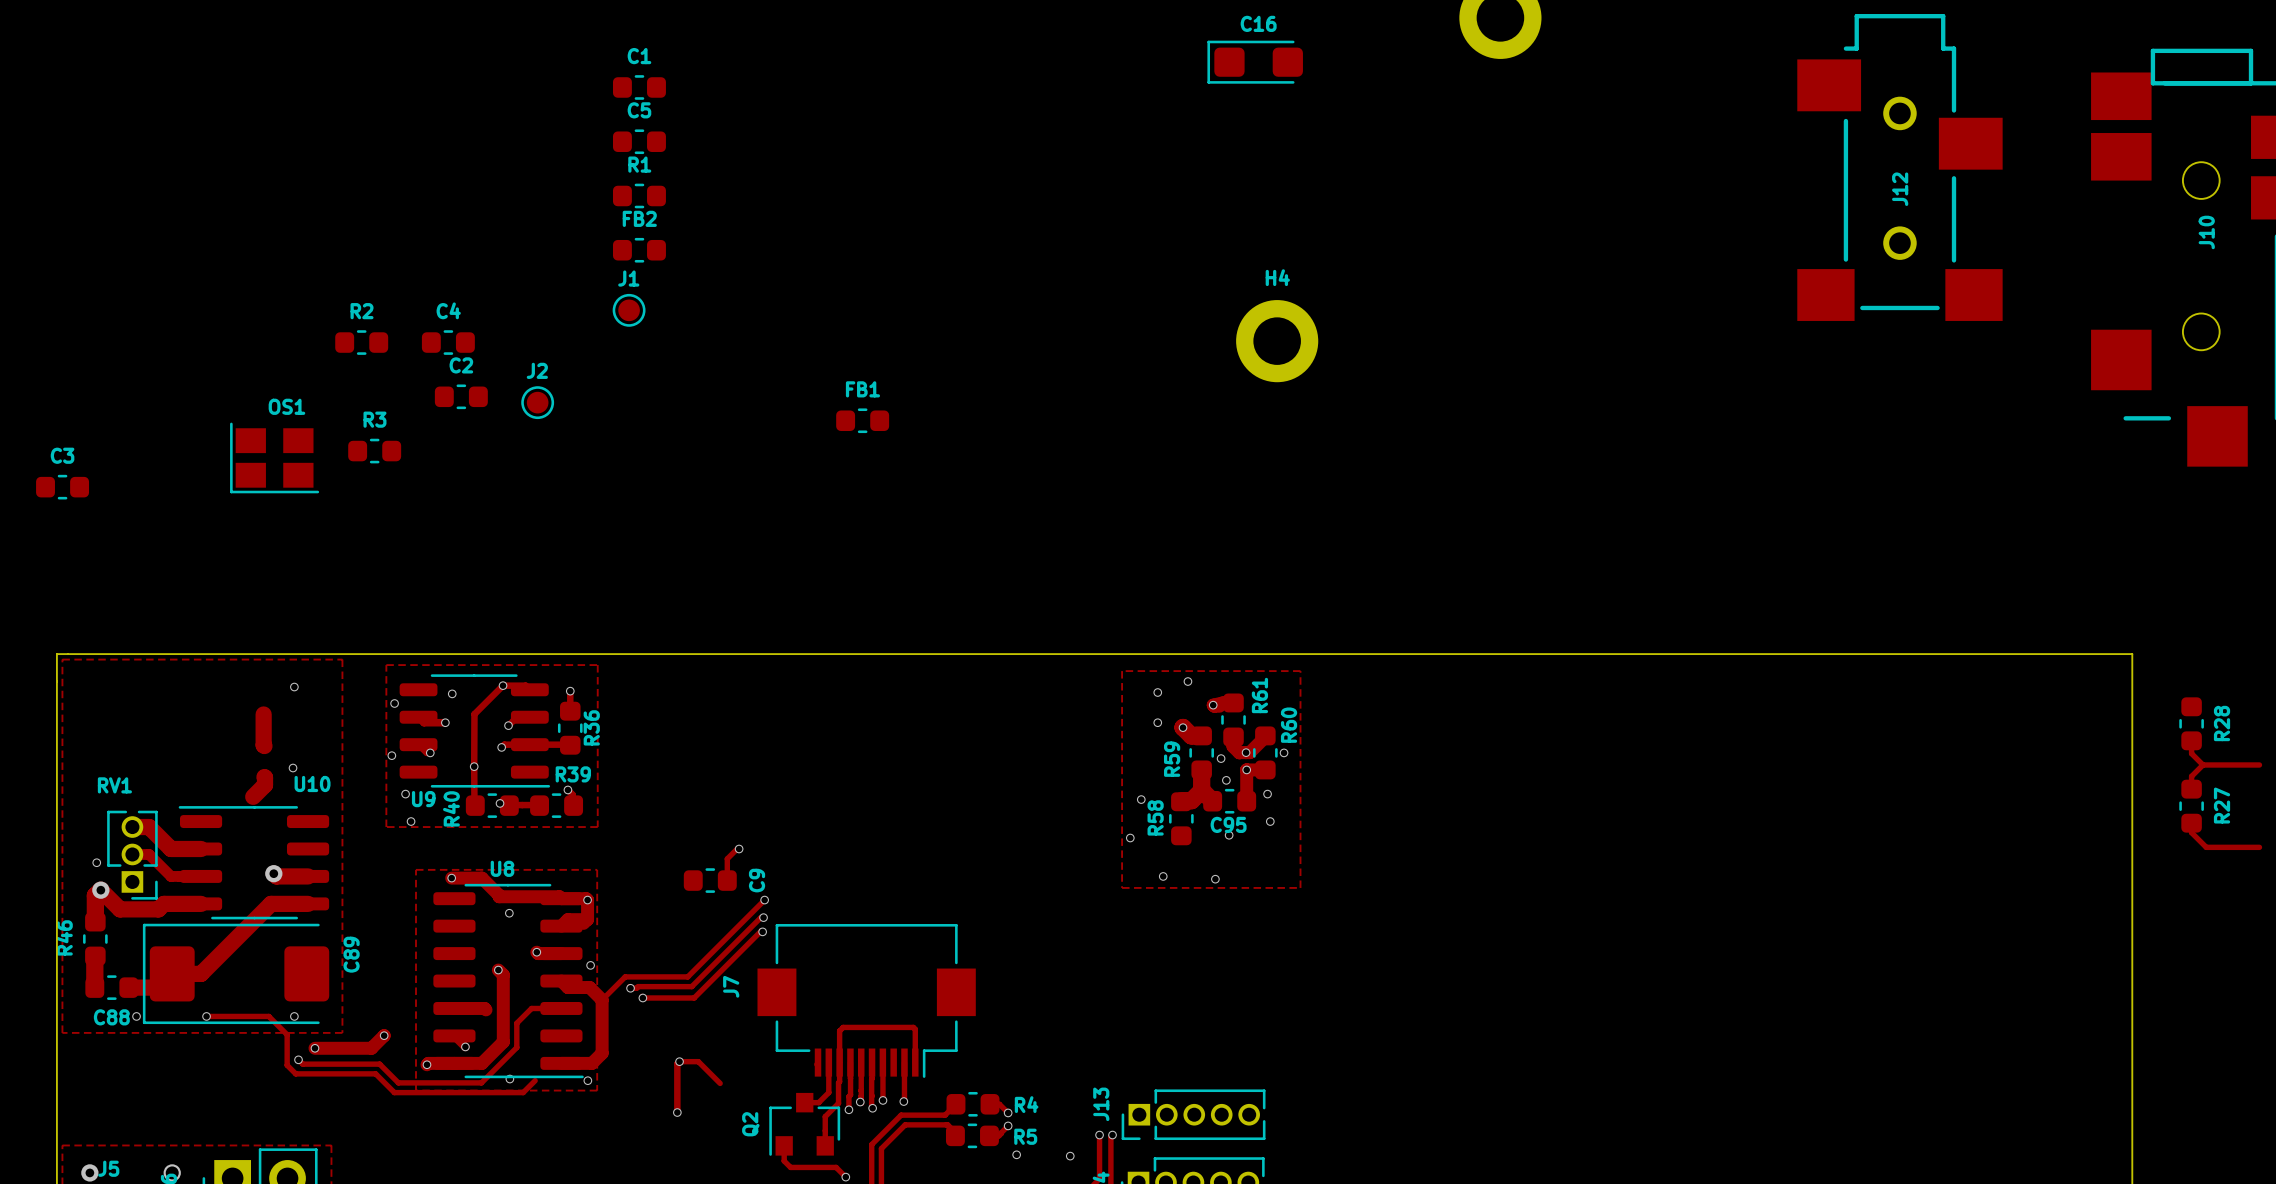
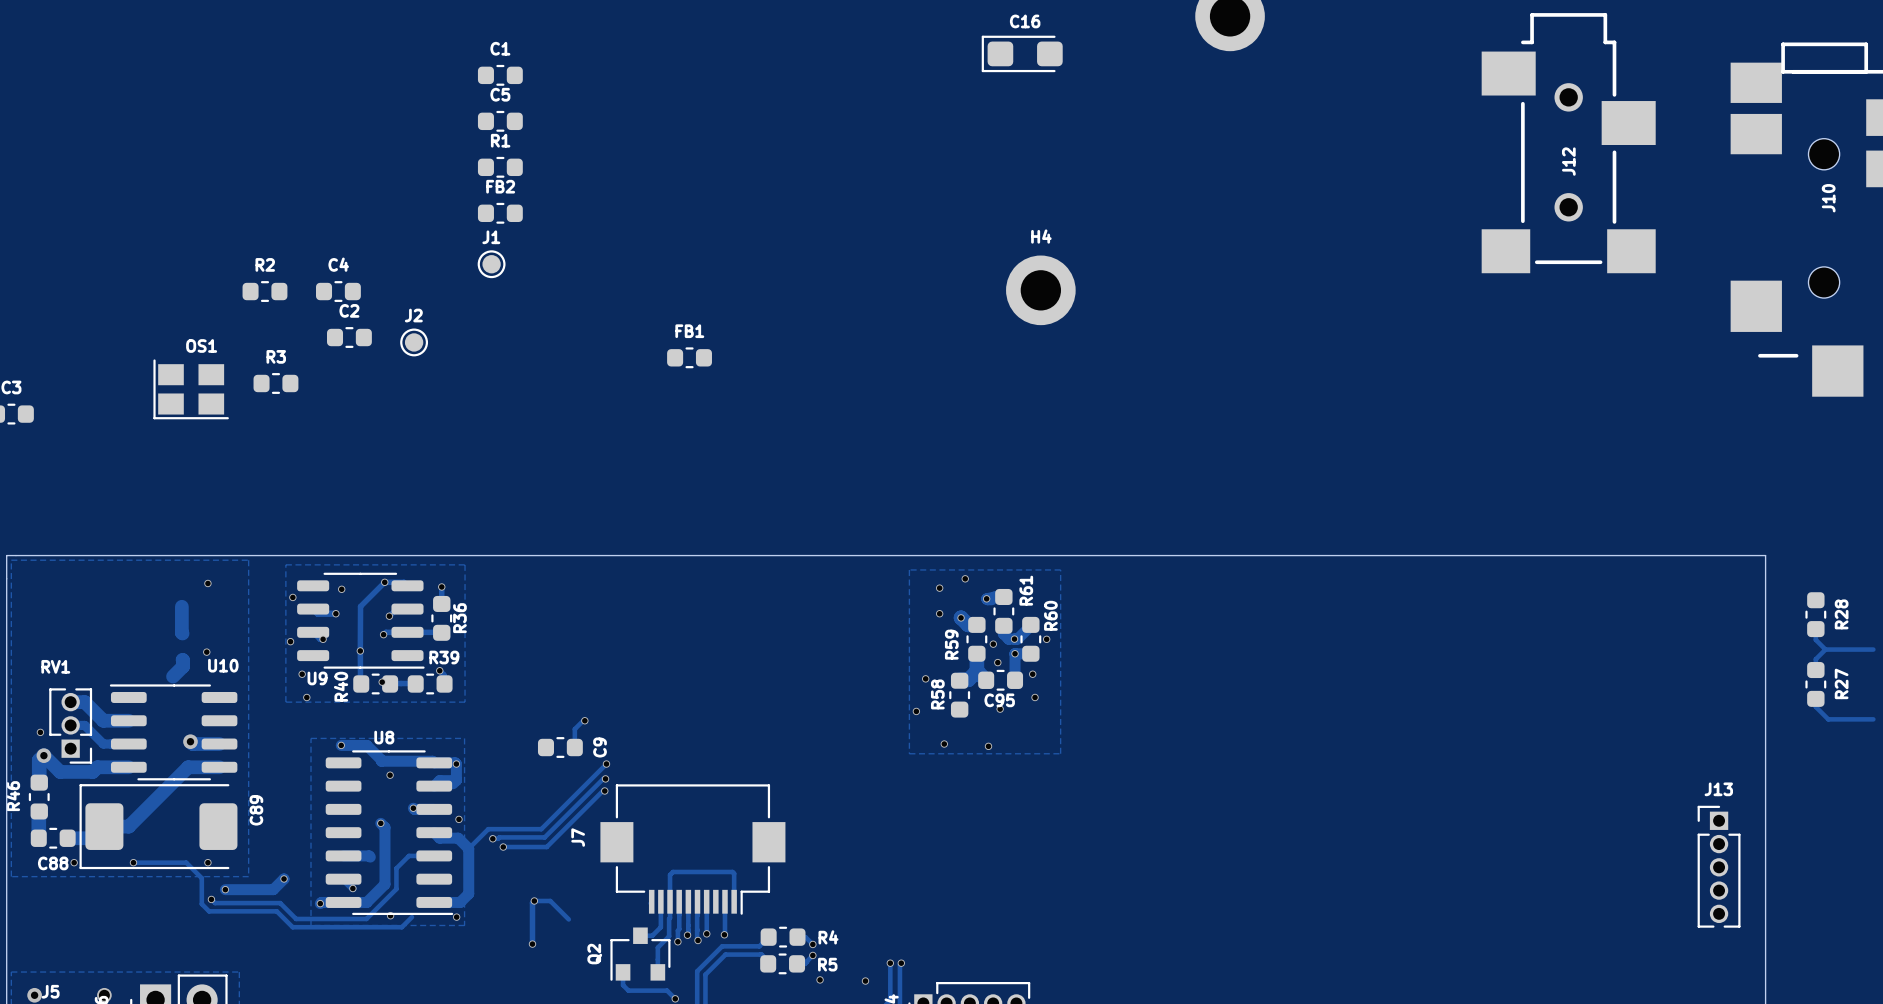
J13 rotation: 0° (1193, 1114) -> 90° clockwise (1719, 866)
J13 position: (1193, 1114) -> (1719, 866)

